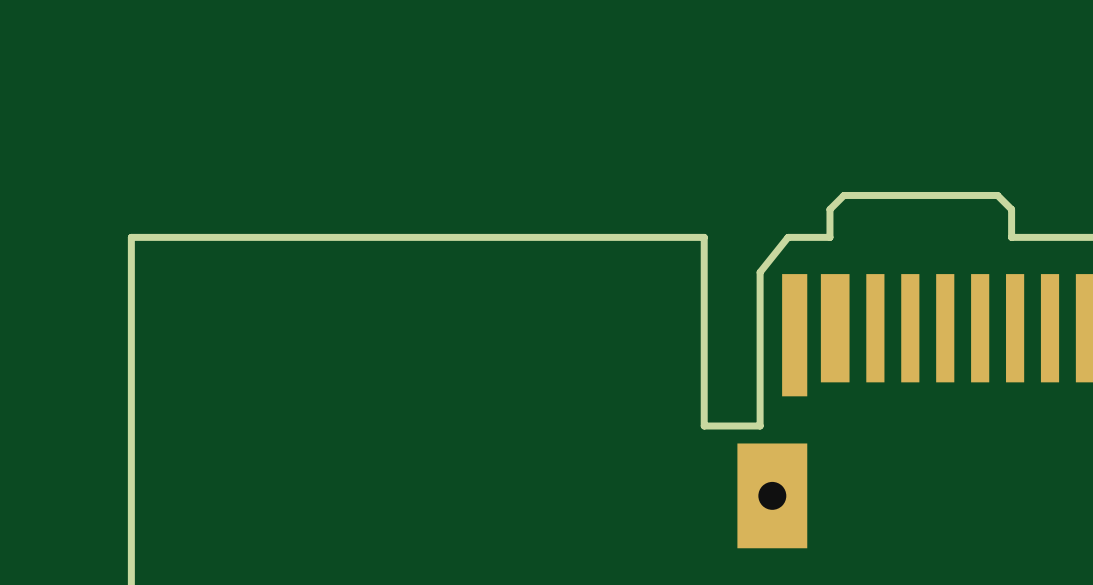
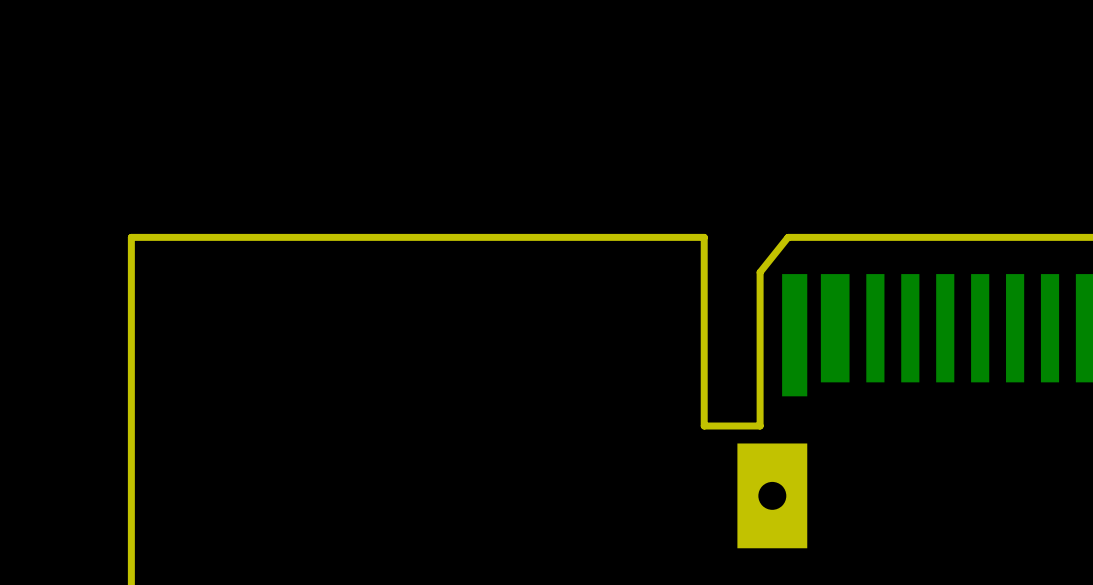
board edge: (1011, 237) (1011, 209) (997, 195) (843, 195) (829, 209) (829, 237) -> (1011, 237) (829, 237)

